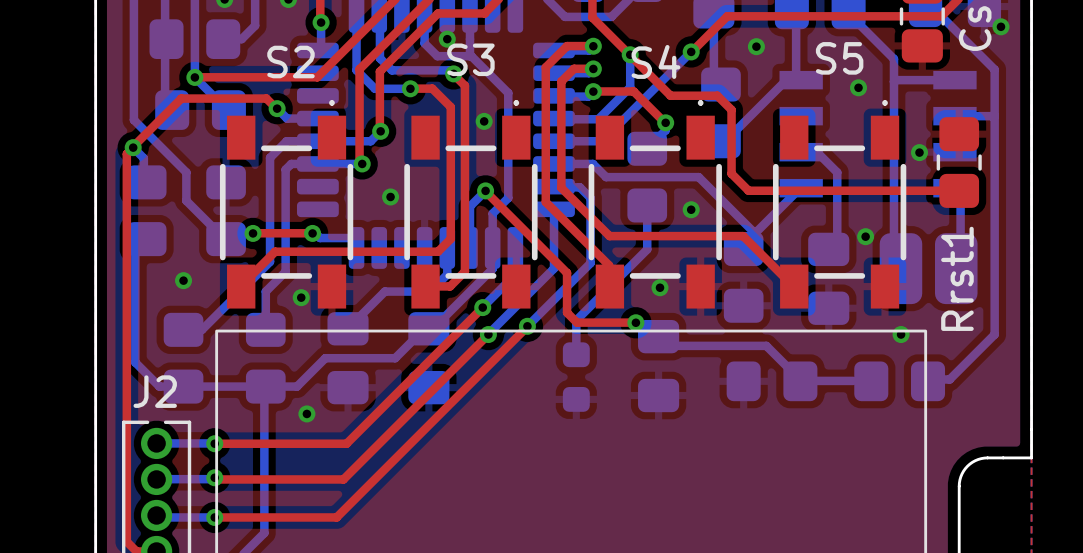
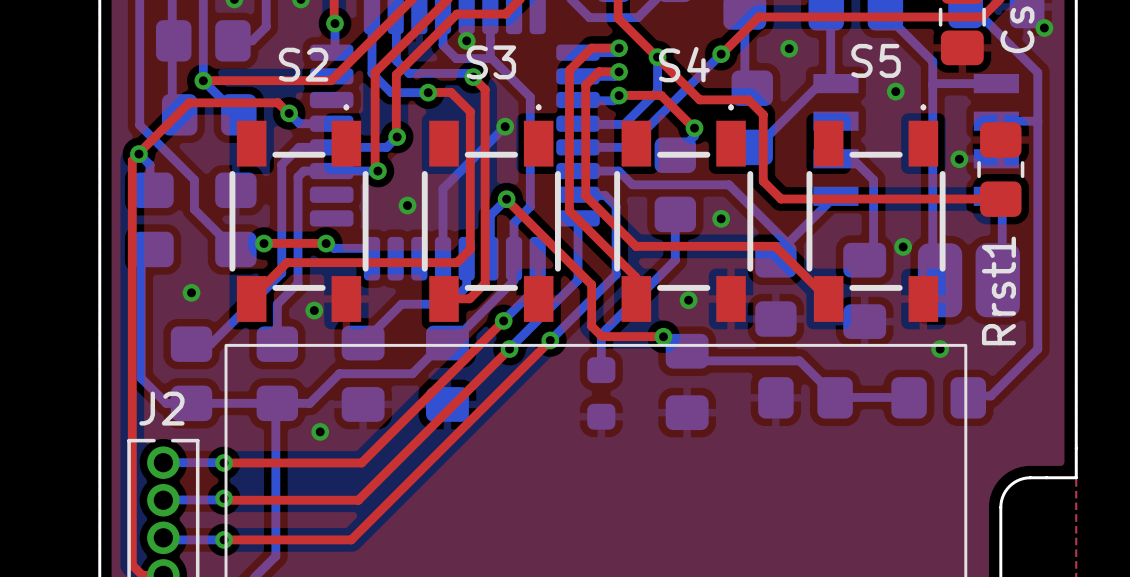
bottom track: none -> (505, 126) (443, 188) (443, 248)

